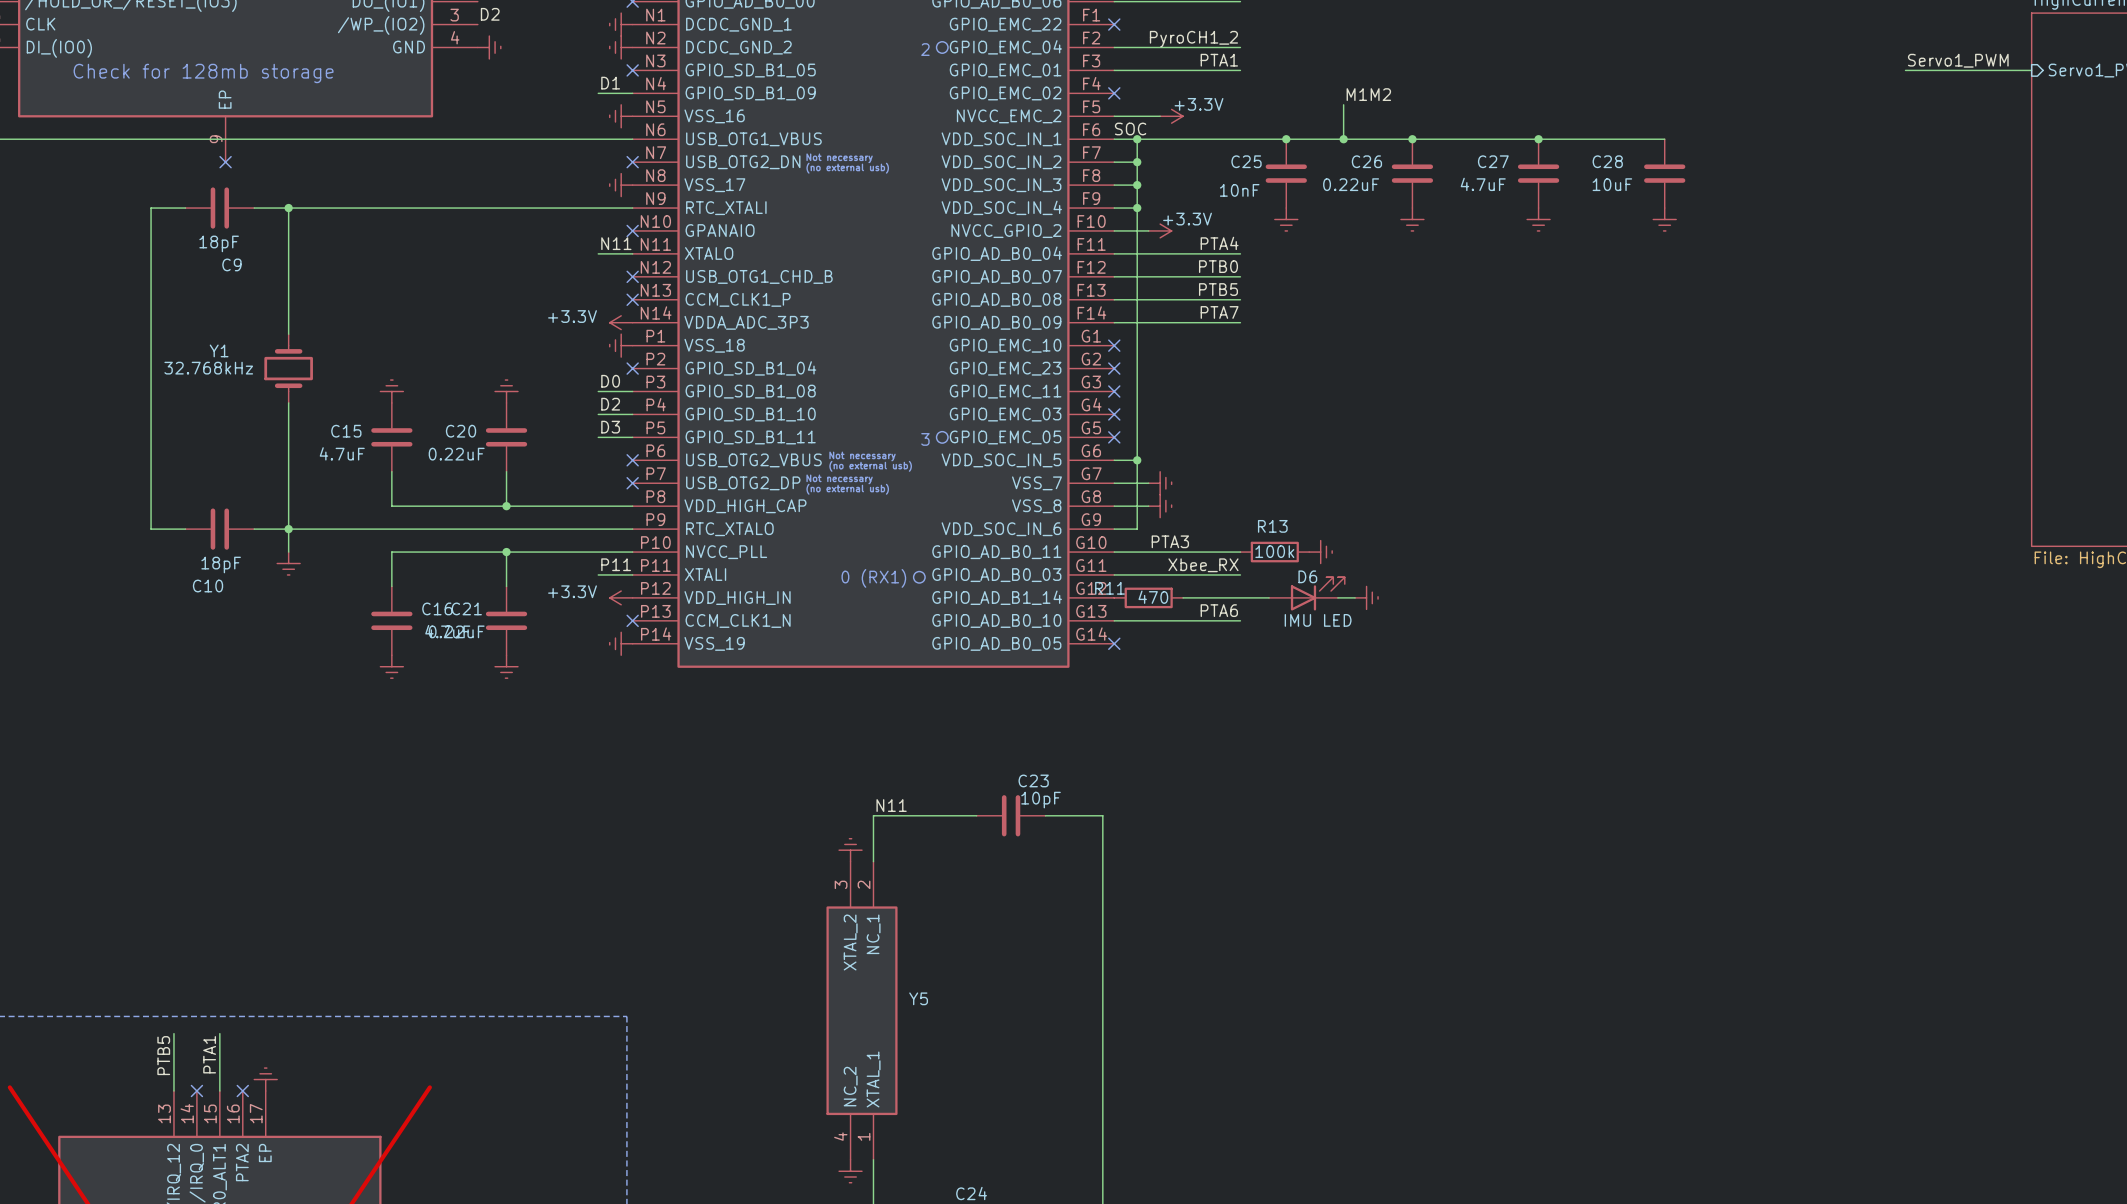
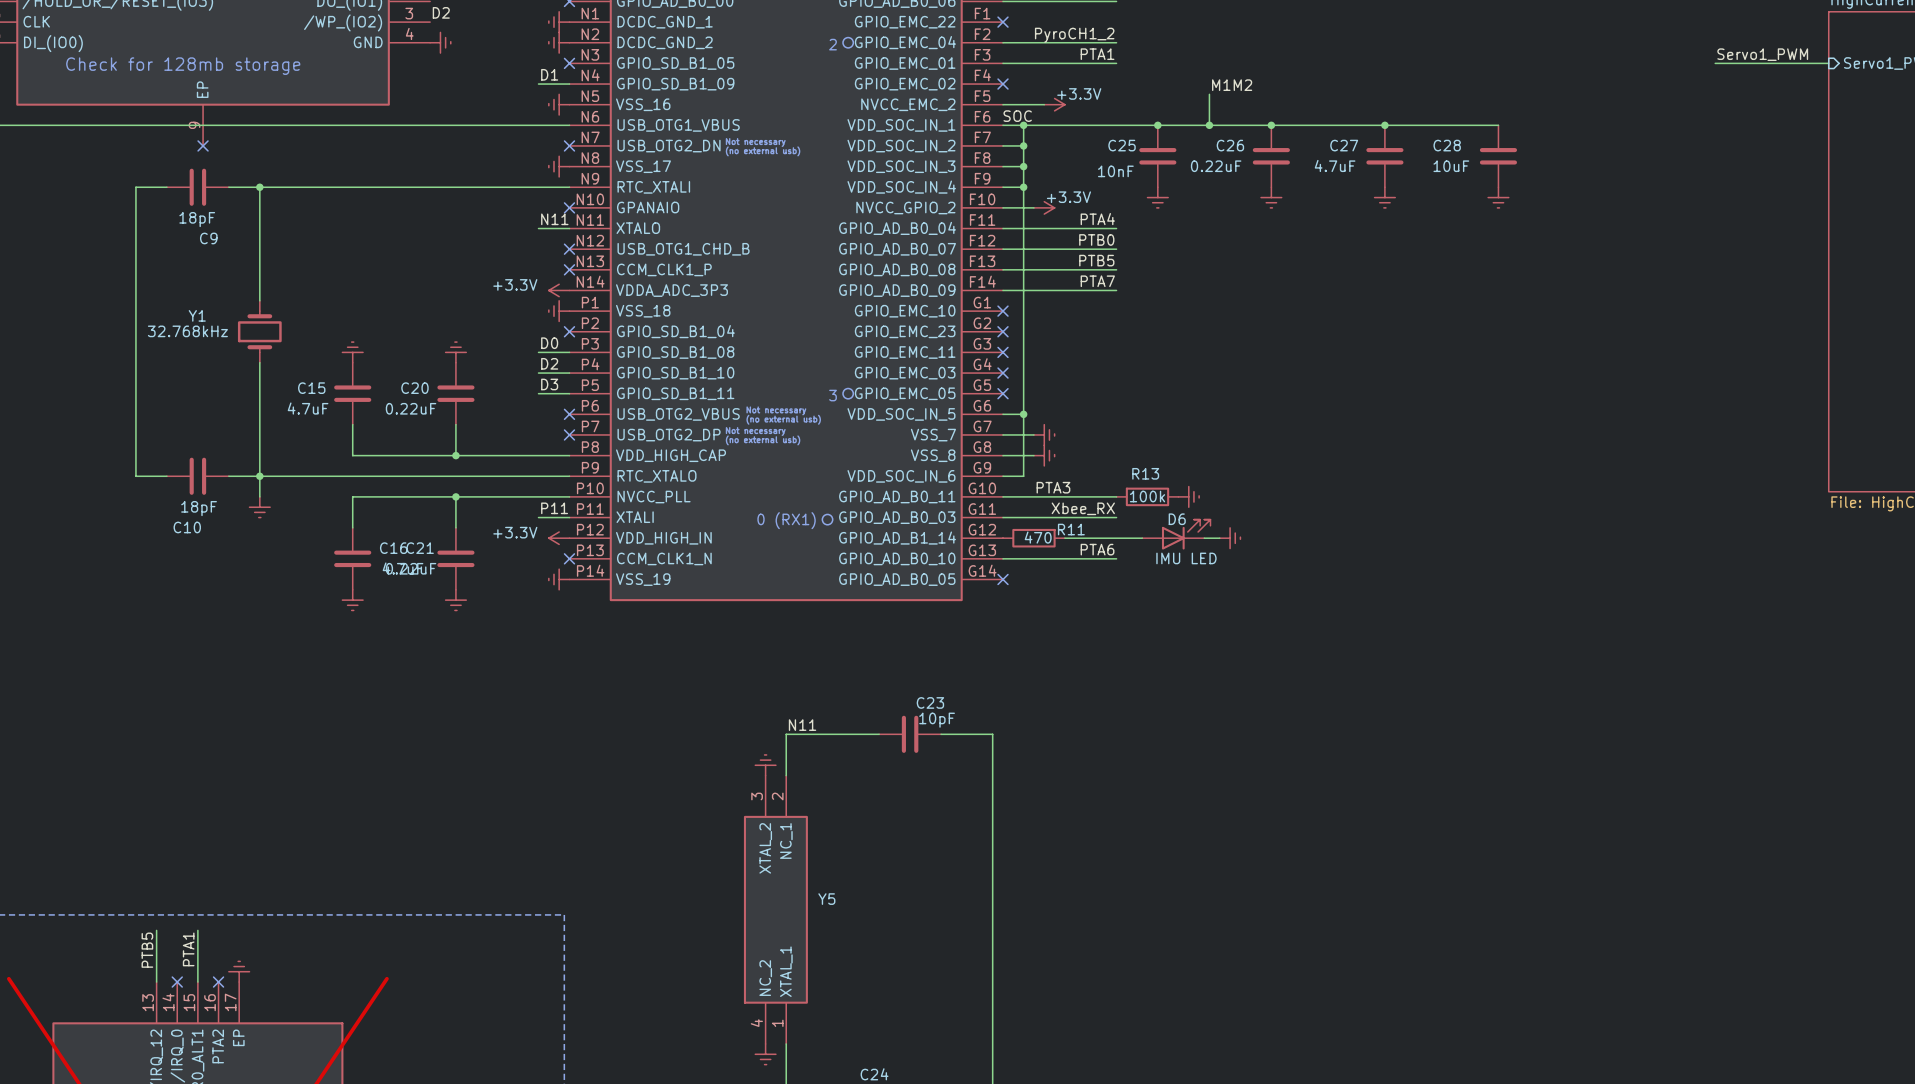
R11 name position: R11 (1109, 588) -> R11 (1071, 529)

